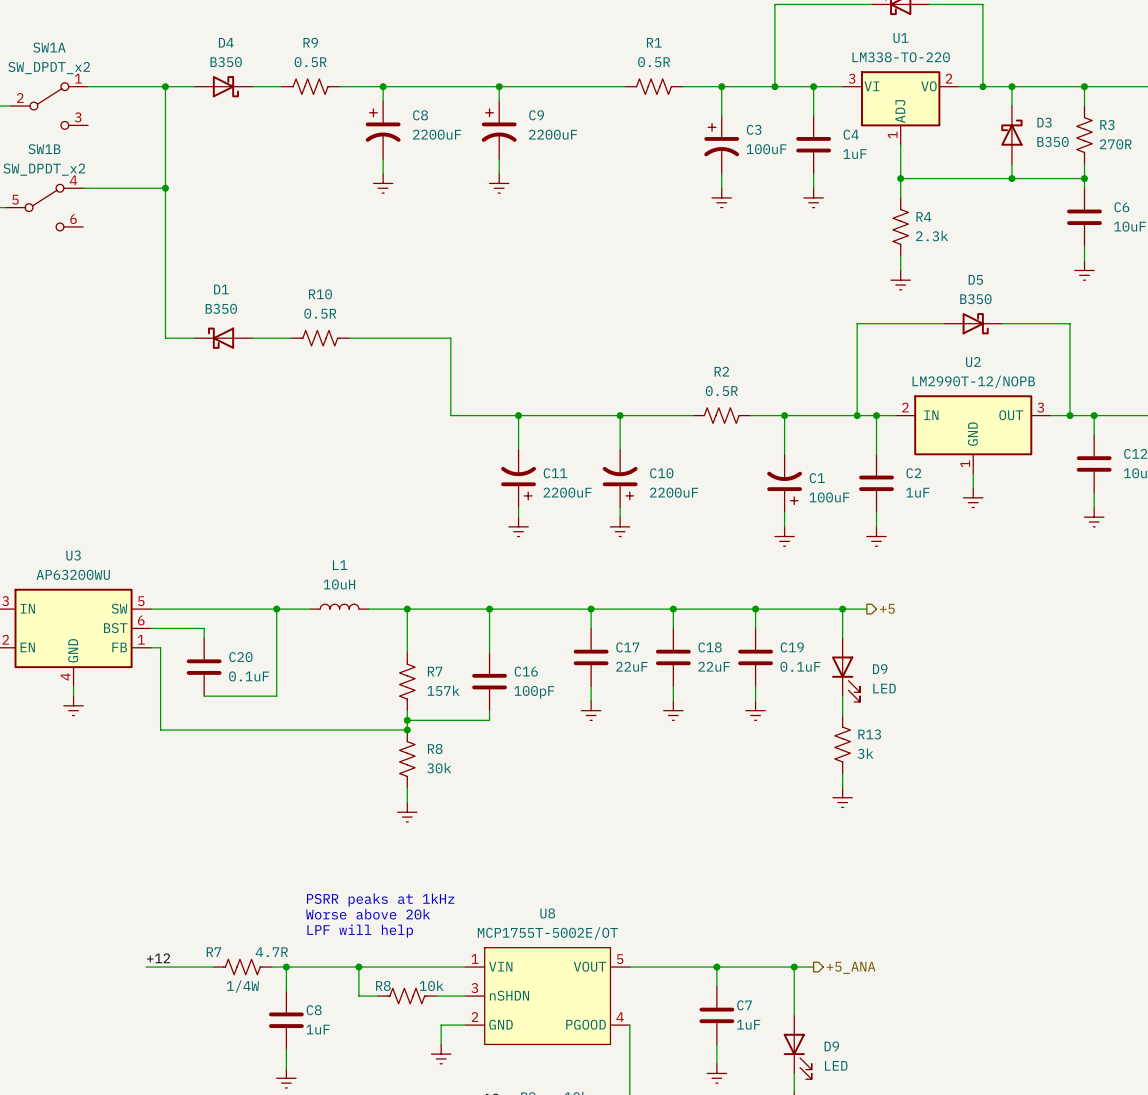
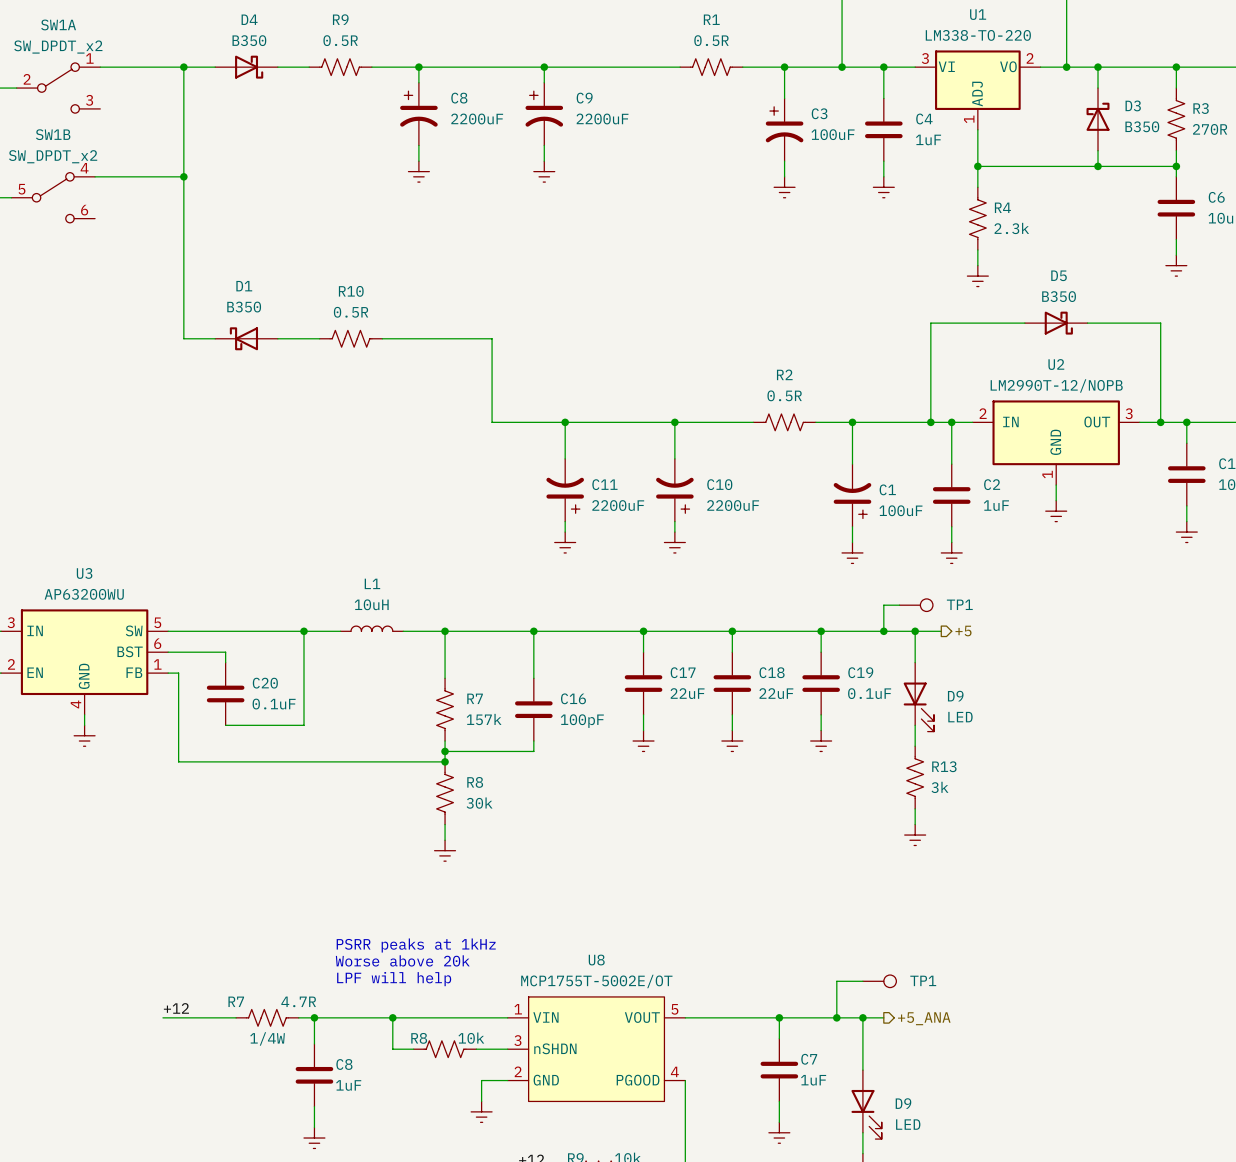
wire: none -> (899, 605) (883, 605) (883, 631)
TP1: none -> (916, 605)
junction: none -> (883, 631)
wire: none -> (862, 981) (836, 981) (836, 1017)
TP1: none -> (879, 981)
junction: none -> (836, 1017)

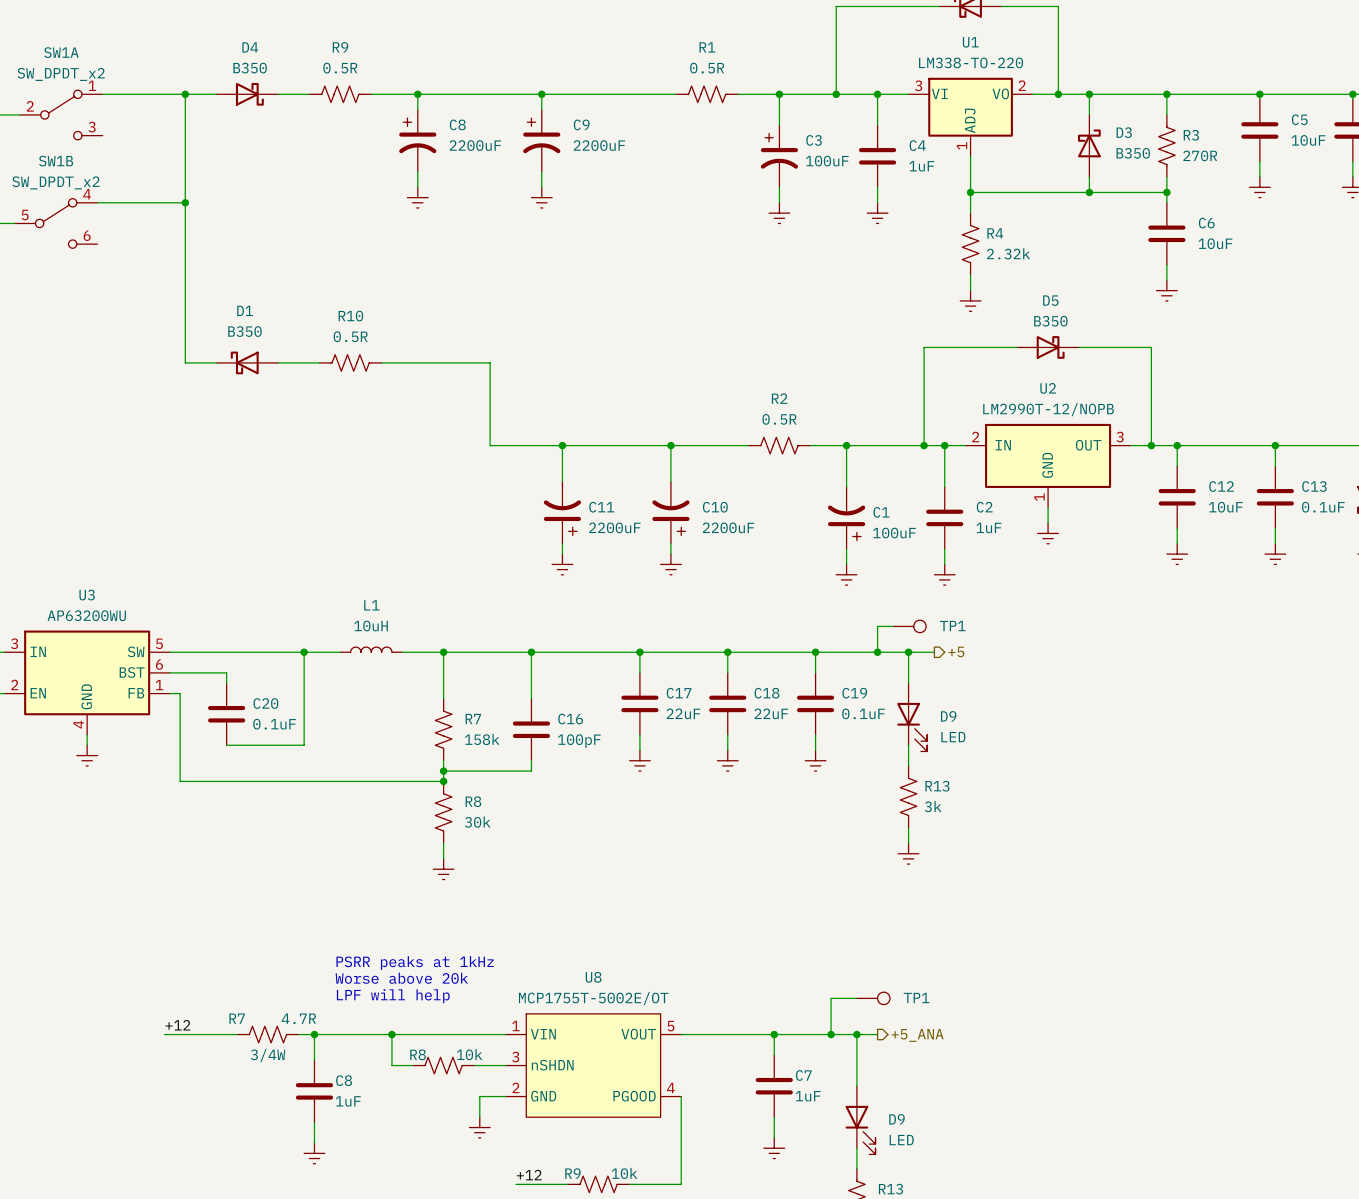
R4 value: 2.3k (1011, 228) -> 2.32k (1008, 253)
R7 value: 157k (484, 719) -> 158k (482, 739)
R7 text: 1/4W (267, 1038) -> 3/4W (268, 1055)

